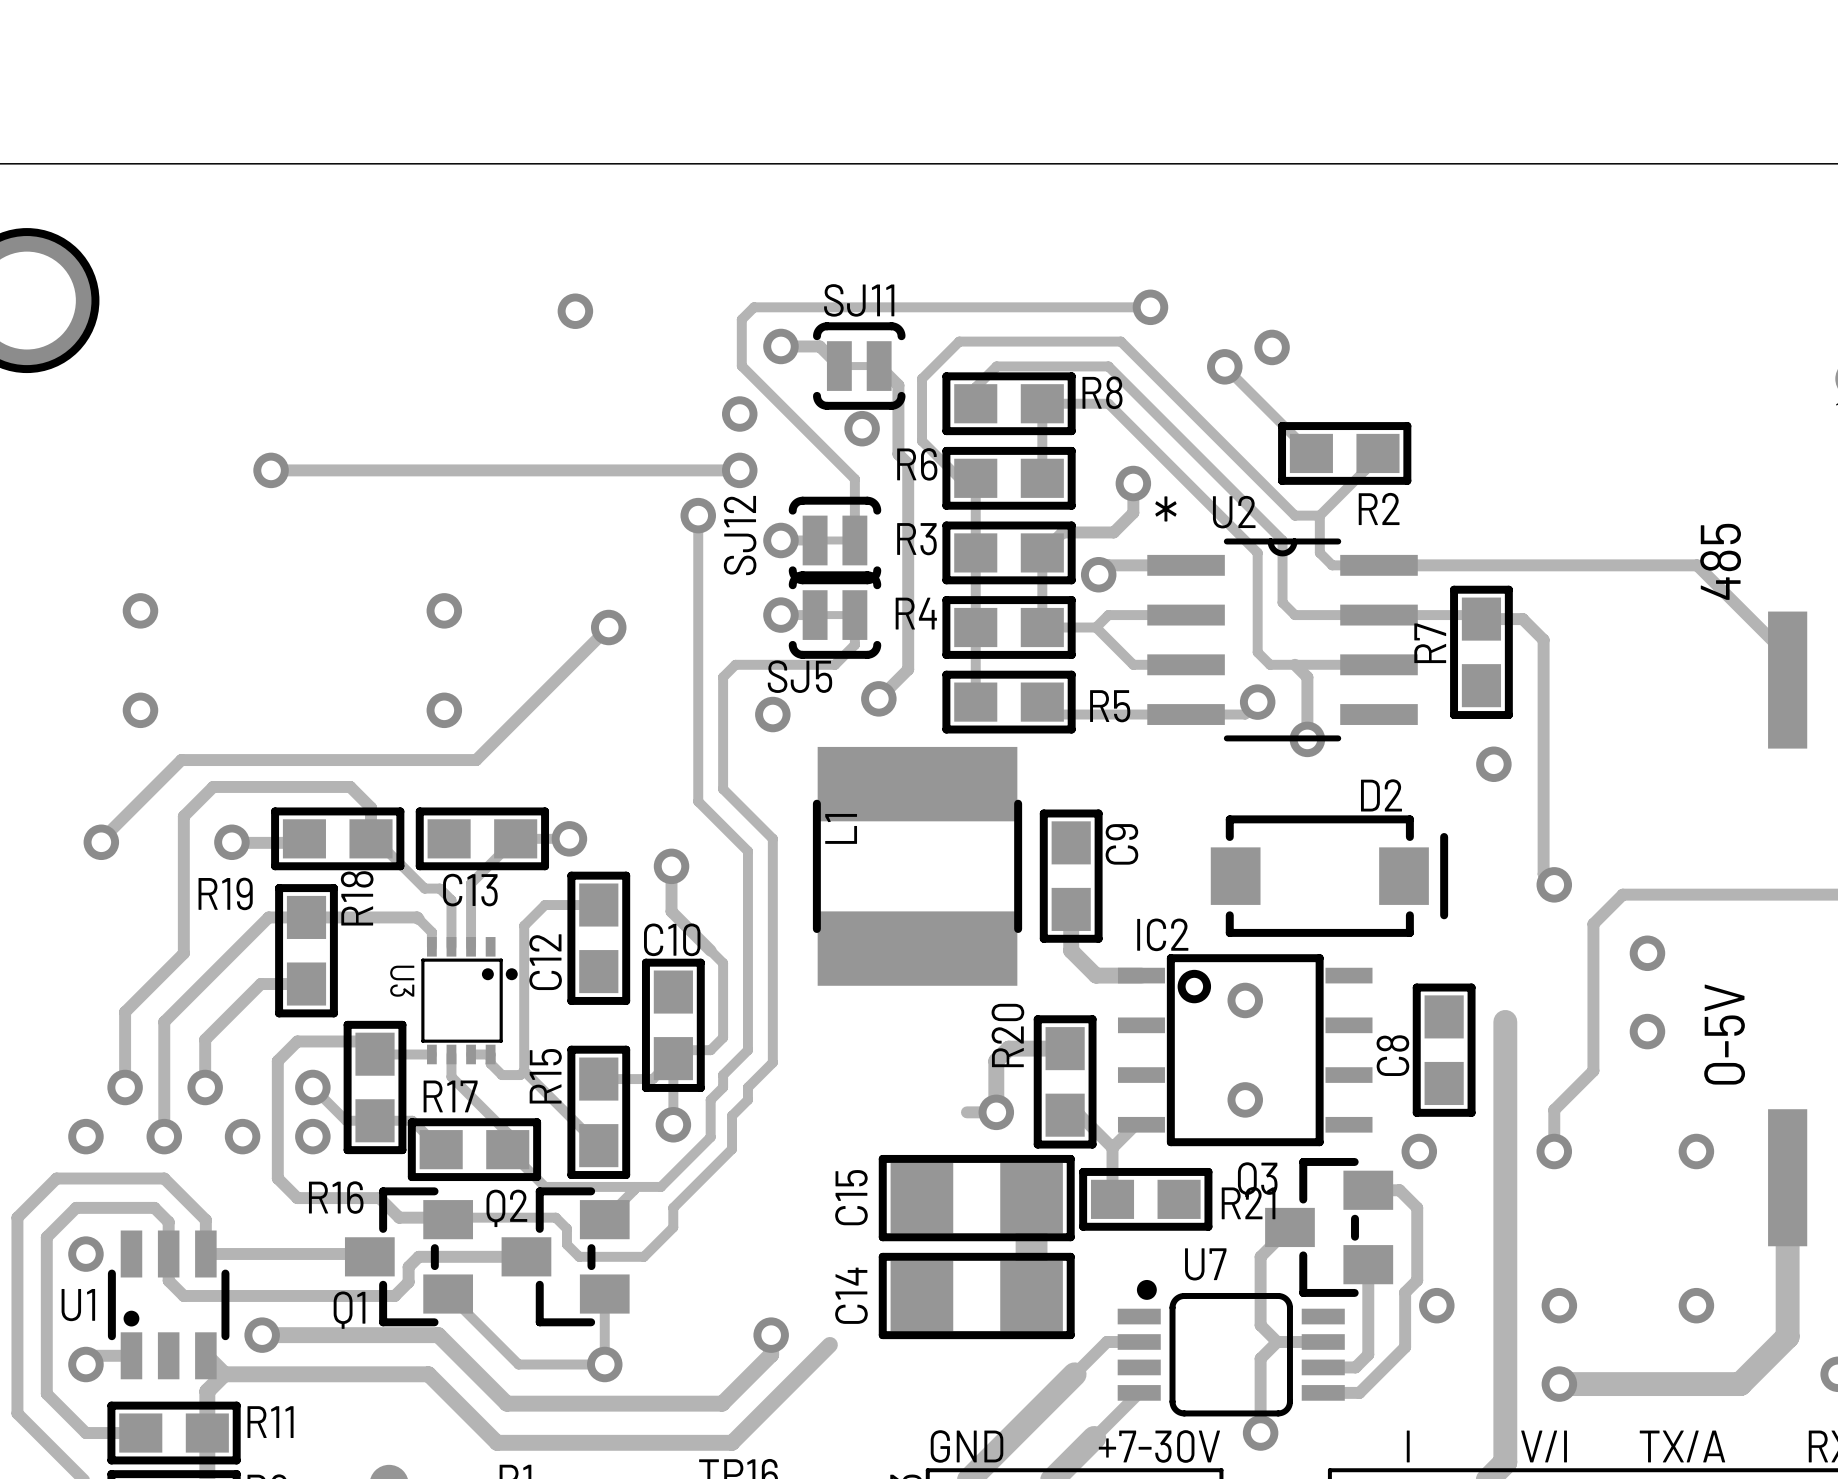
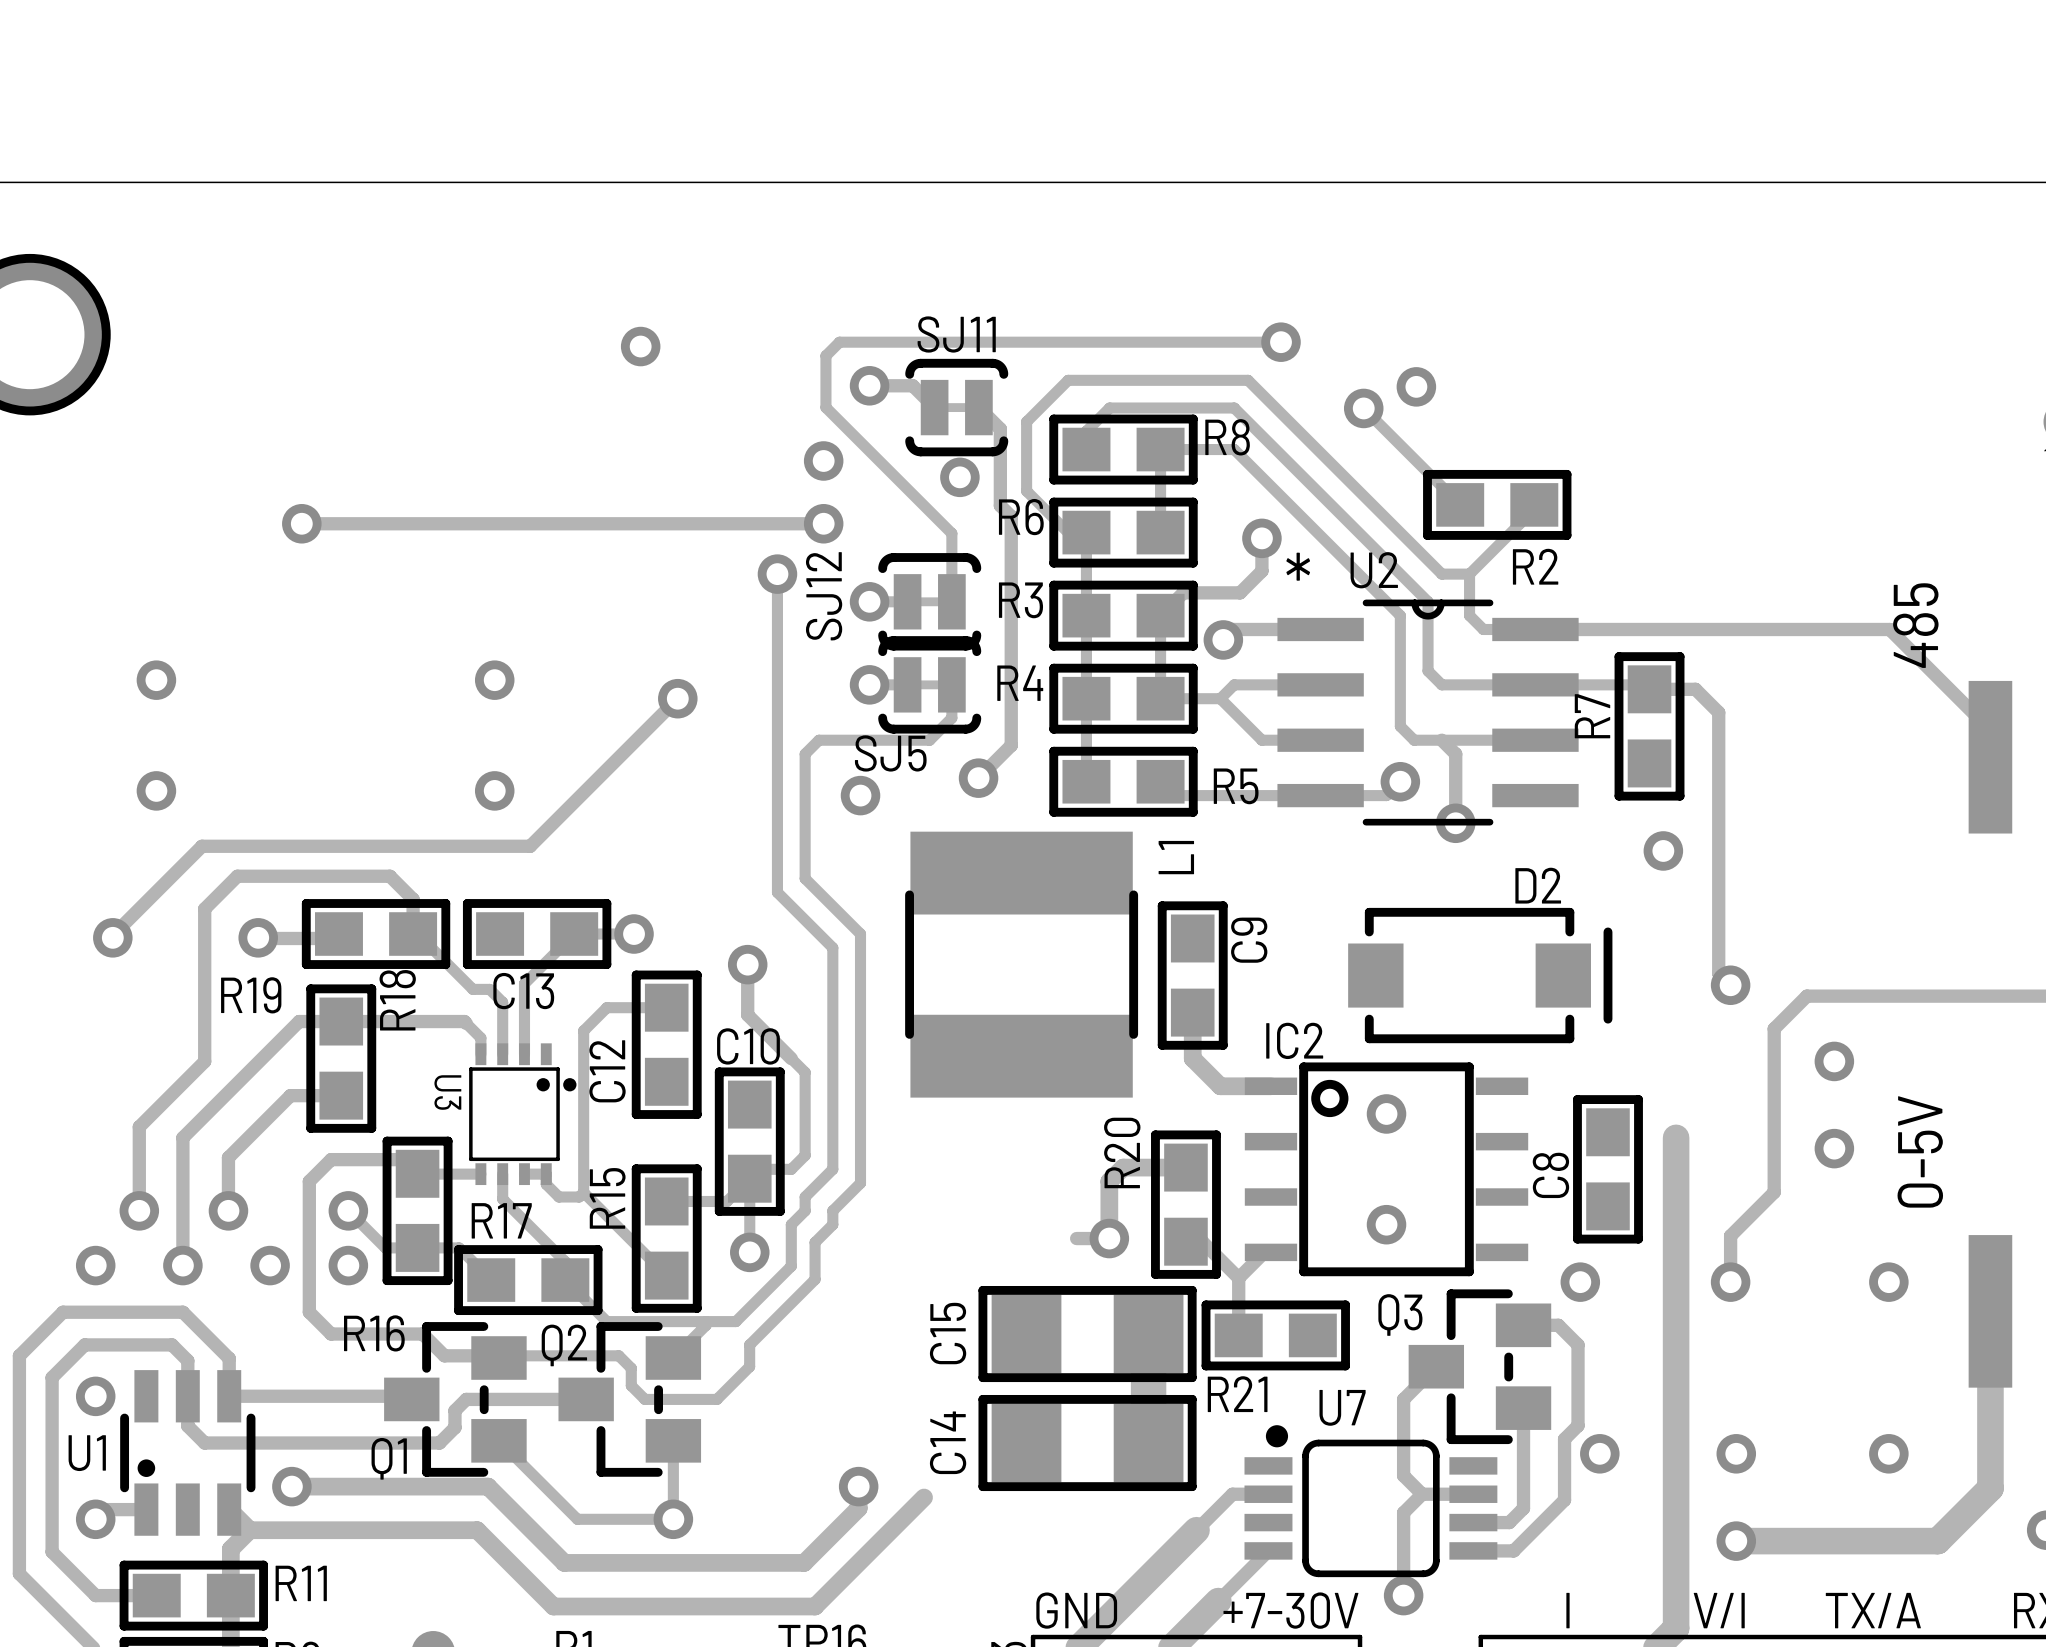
L1 name position: L1 (841, 828) -> L1 (1176, 857)
R21 name position: R21 (1248, 1203) -> R21 (1237, 1394)

